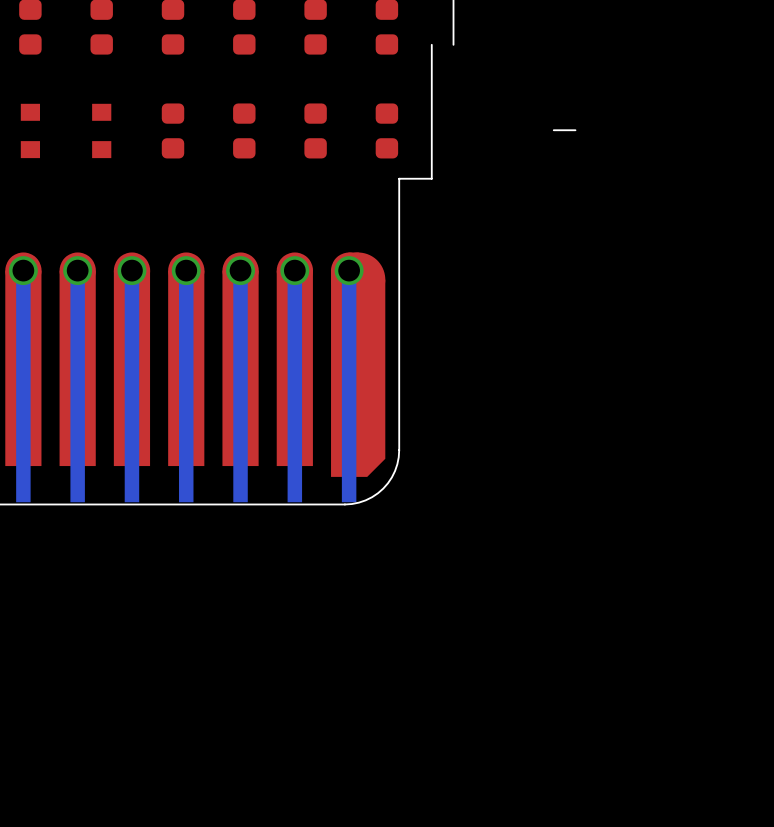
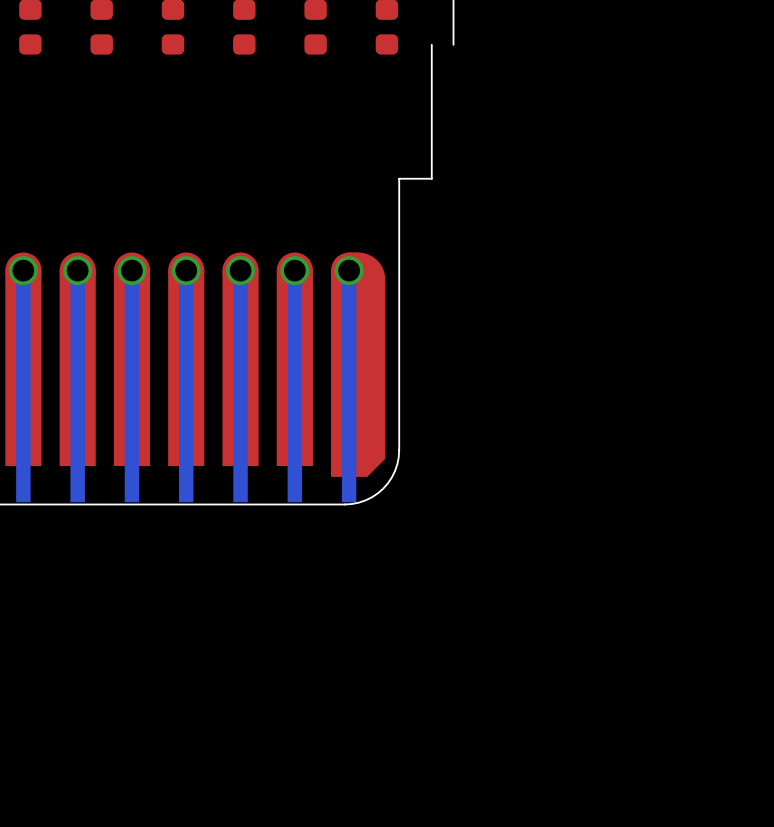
part: (30, 130) -> none
part: (101, 130) -> none
part: (173, 130) -> none
part: (244, 130) -> none
part: (315, 130) -> none
part: (386, 130) -> none
board edge: (575, 130) (553, 130) -> none

